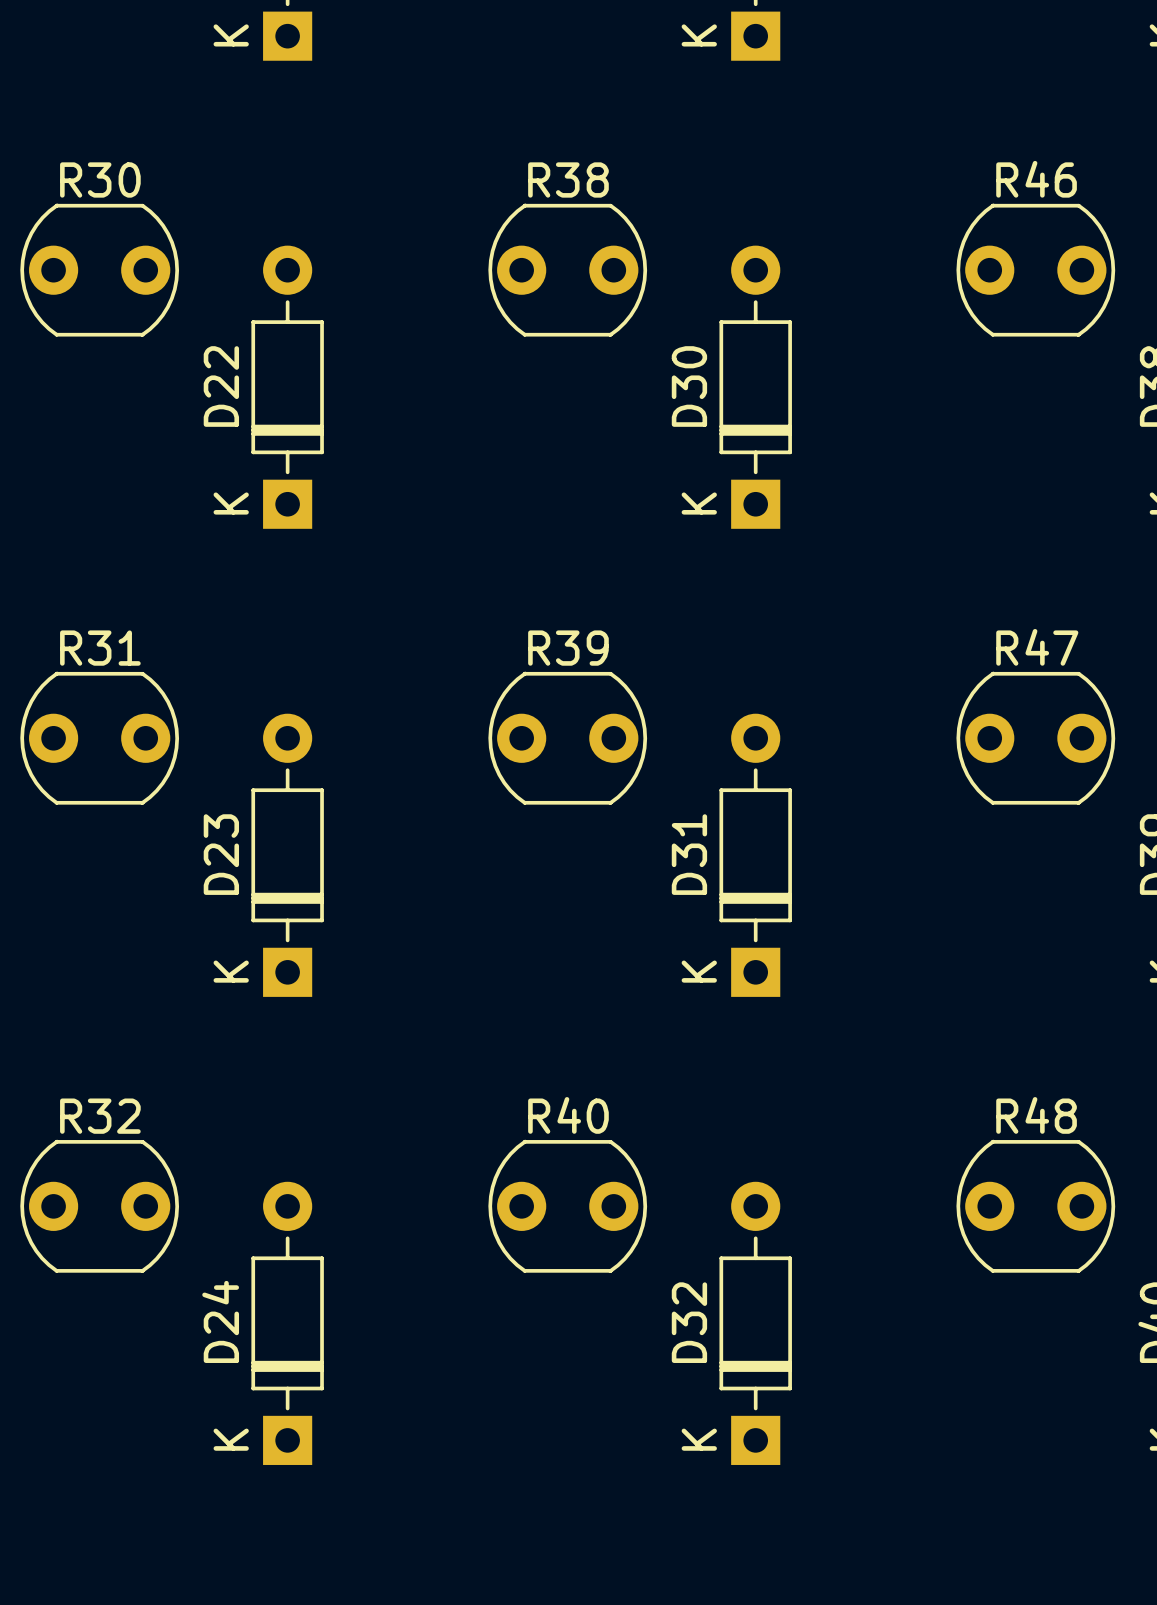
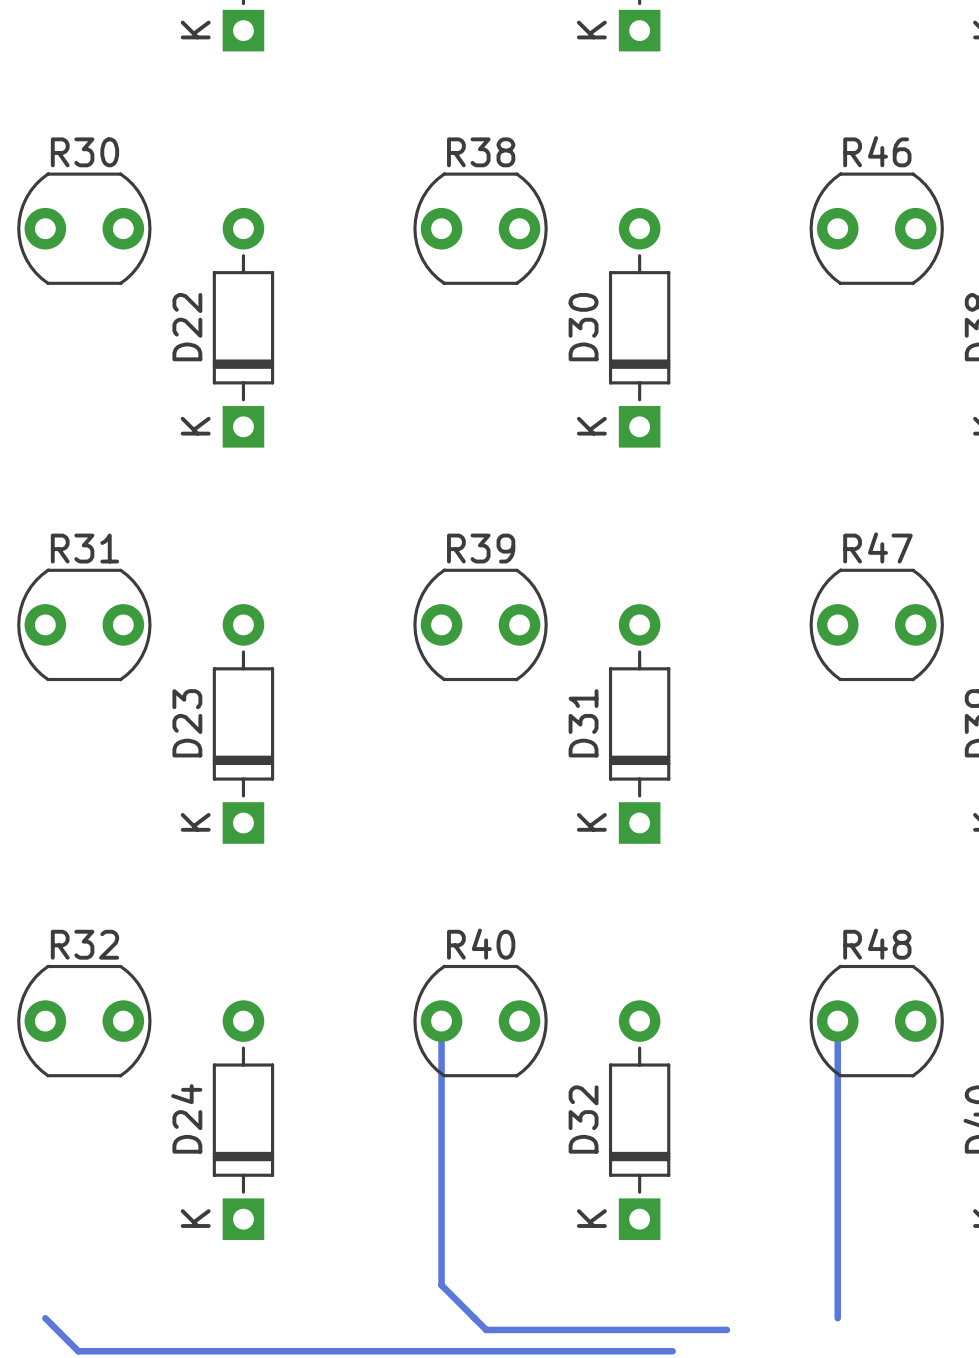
bottom track: none -> (441, 1021) (441, 1285) (486, 1329) (726, 1329)
bottom track: none -> (837, 1021) (837, 1318)
bottom track: none -> (45, 1318) (78, 1351) (672, 1351)

